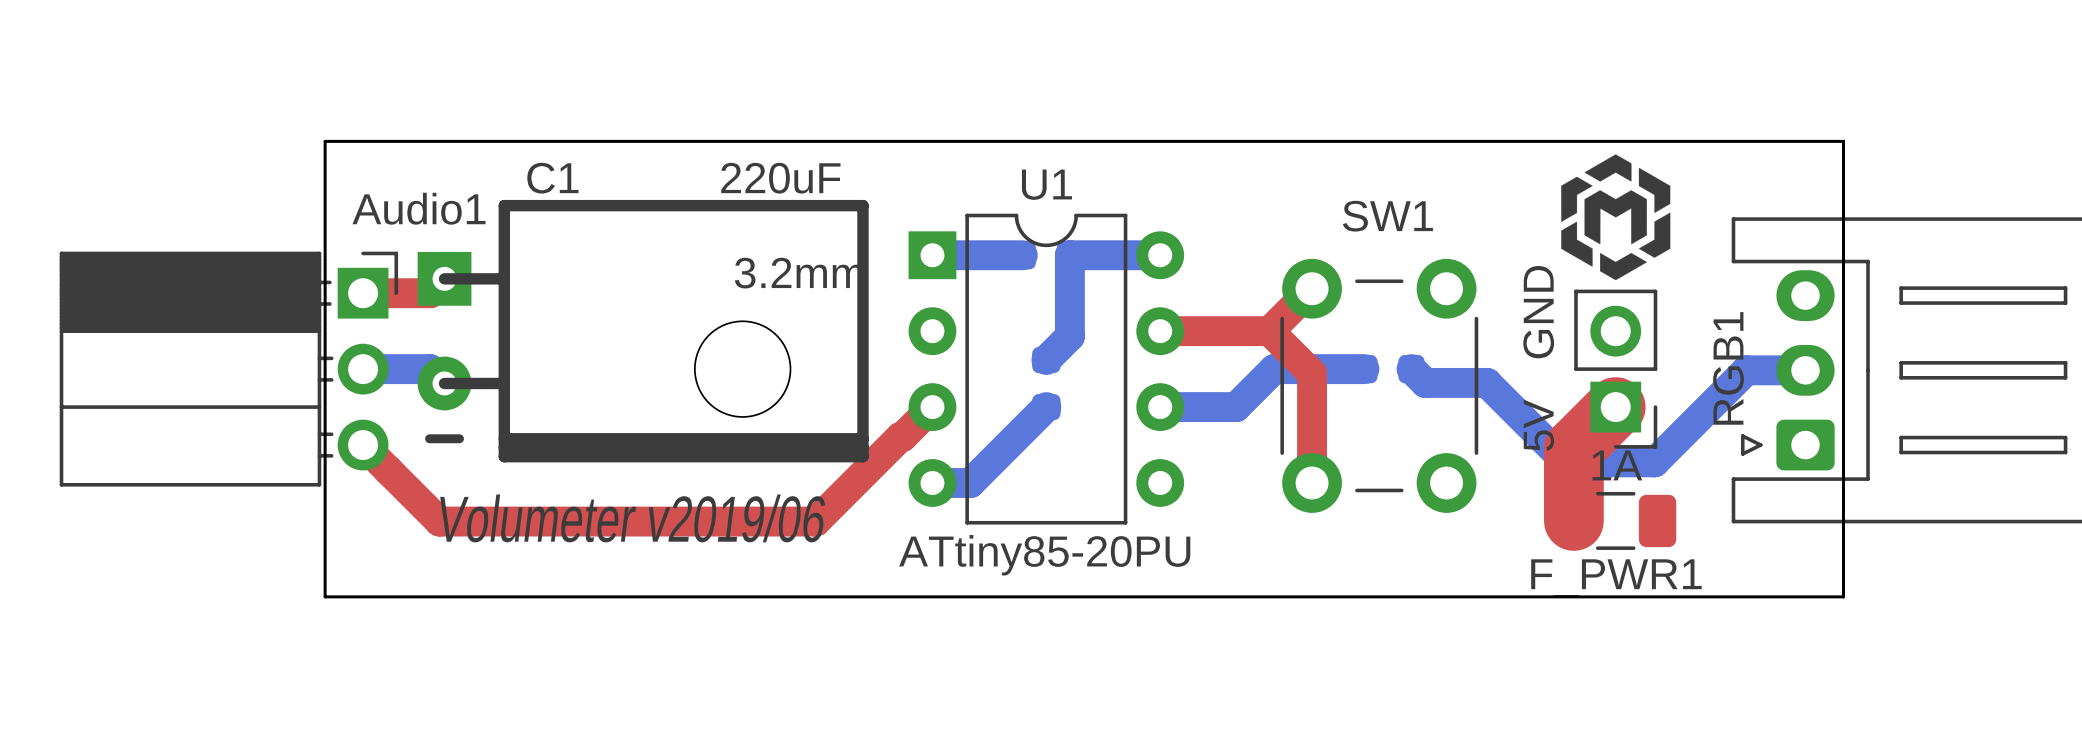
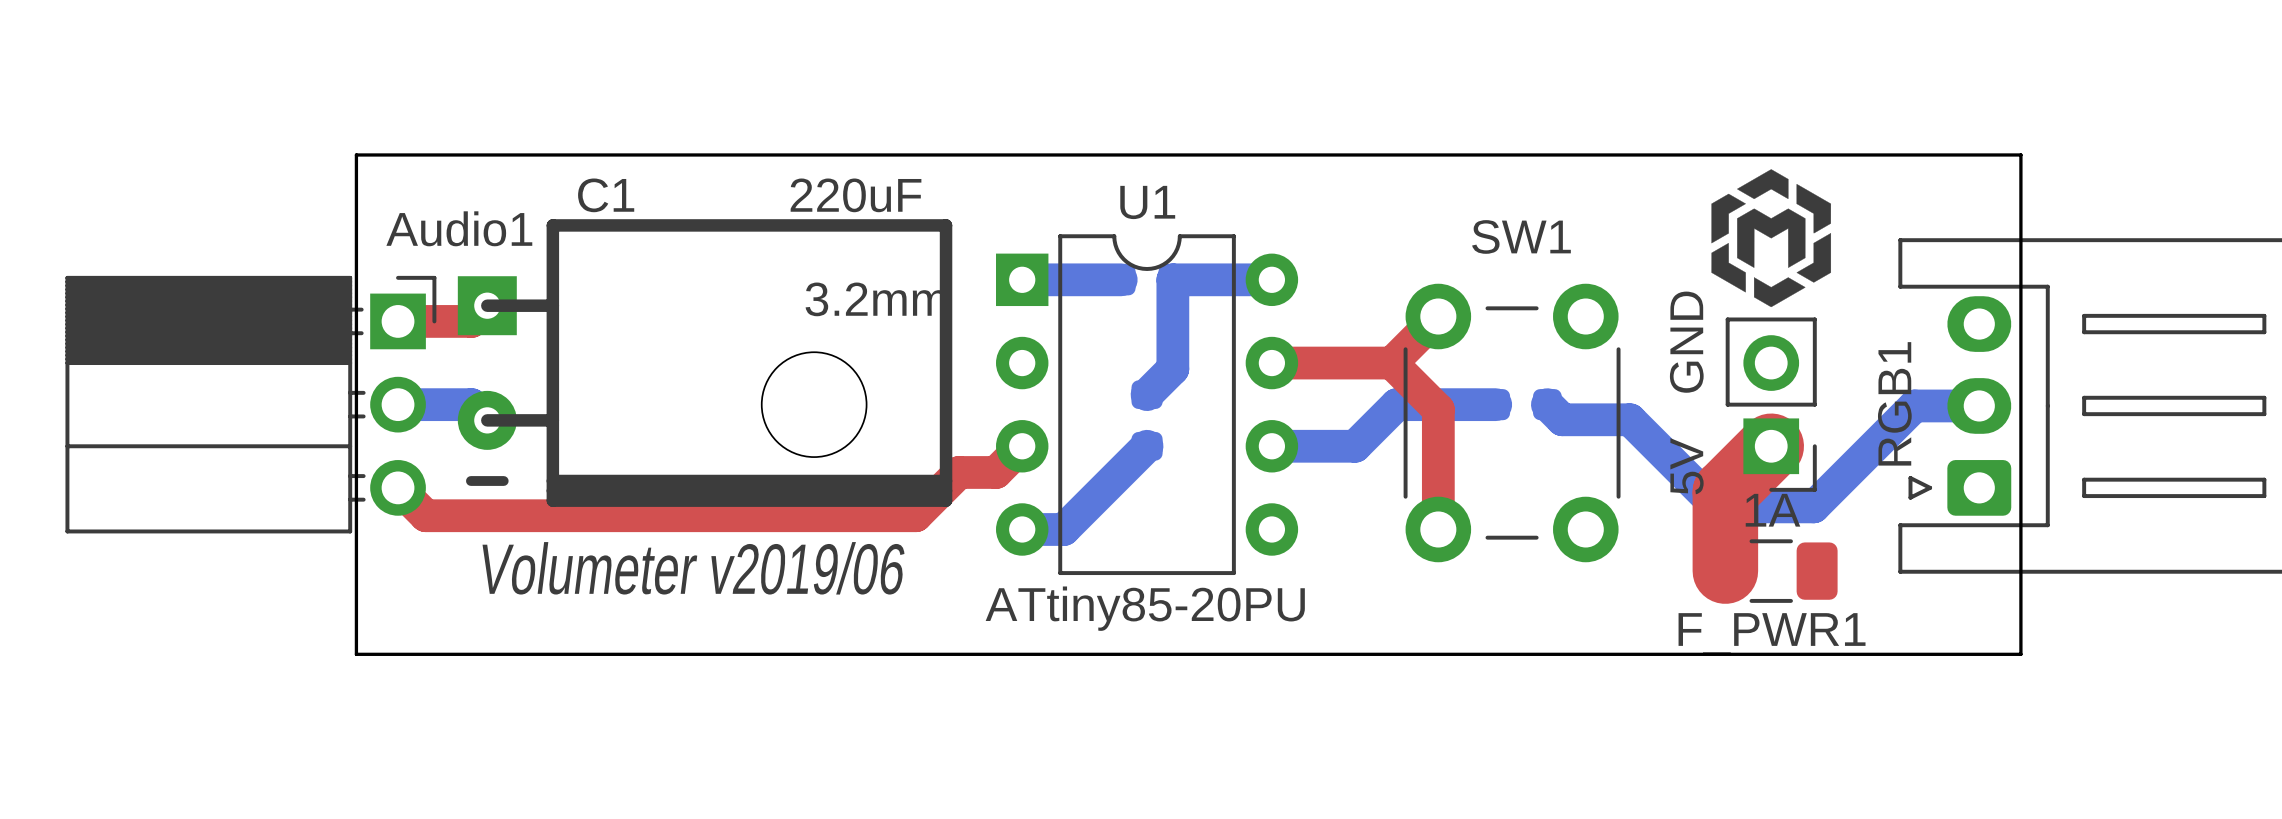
top track: (908, 430) (815, 521) (439, 521) (388, 470) -> (996, 472) (959, 472) (915, 515) (425, 515)

